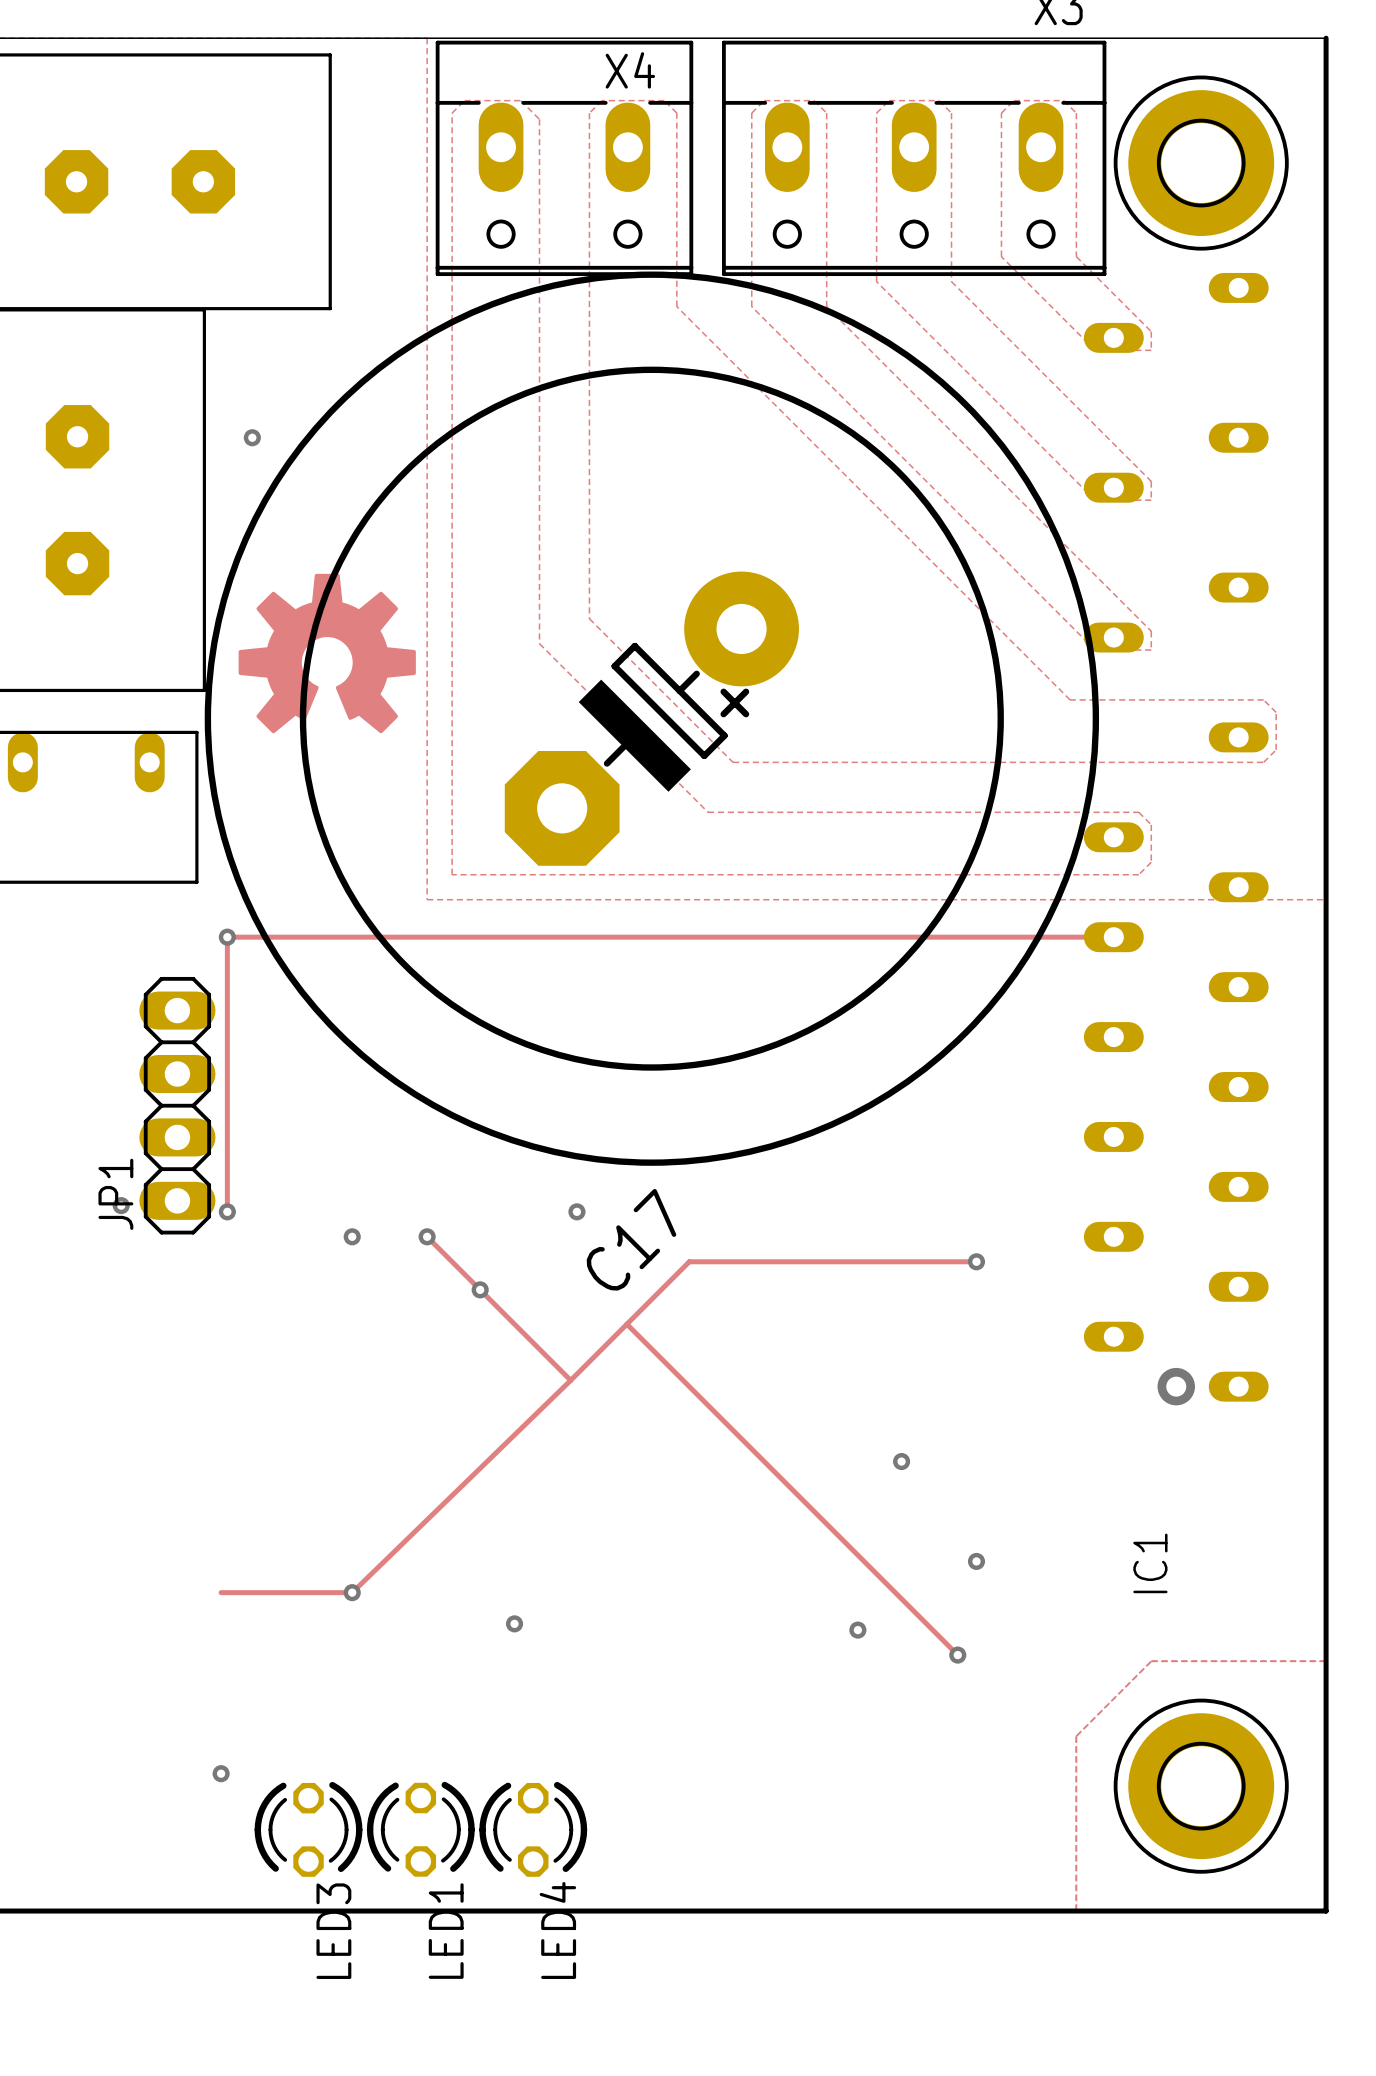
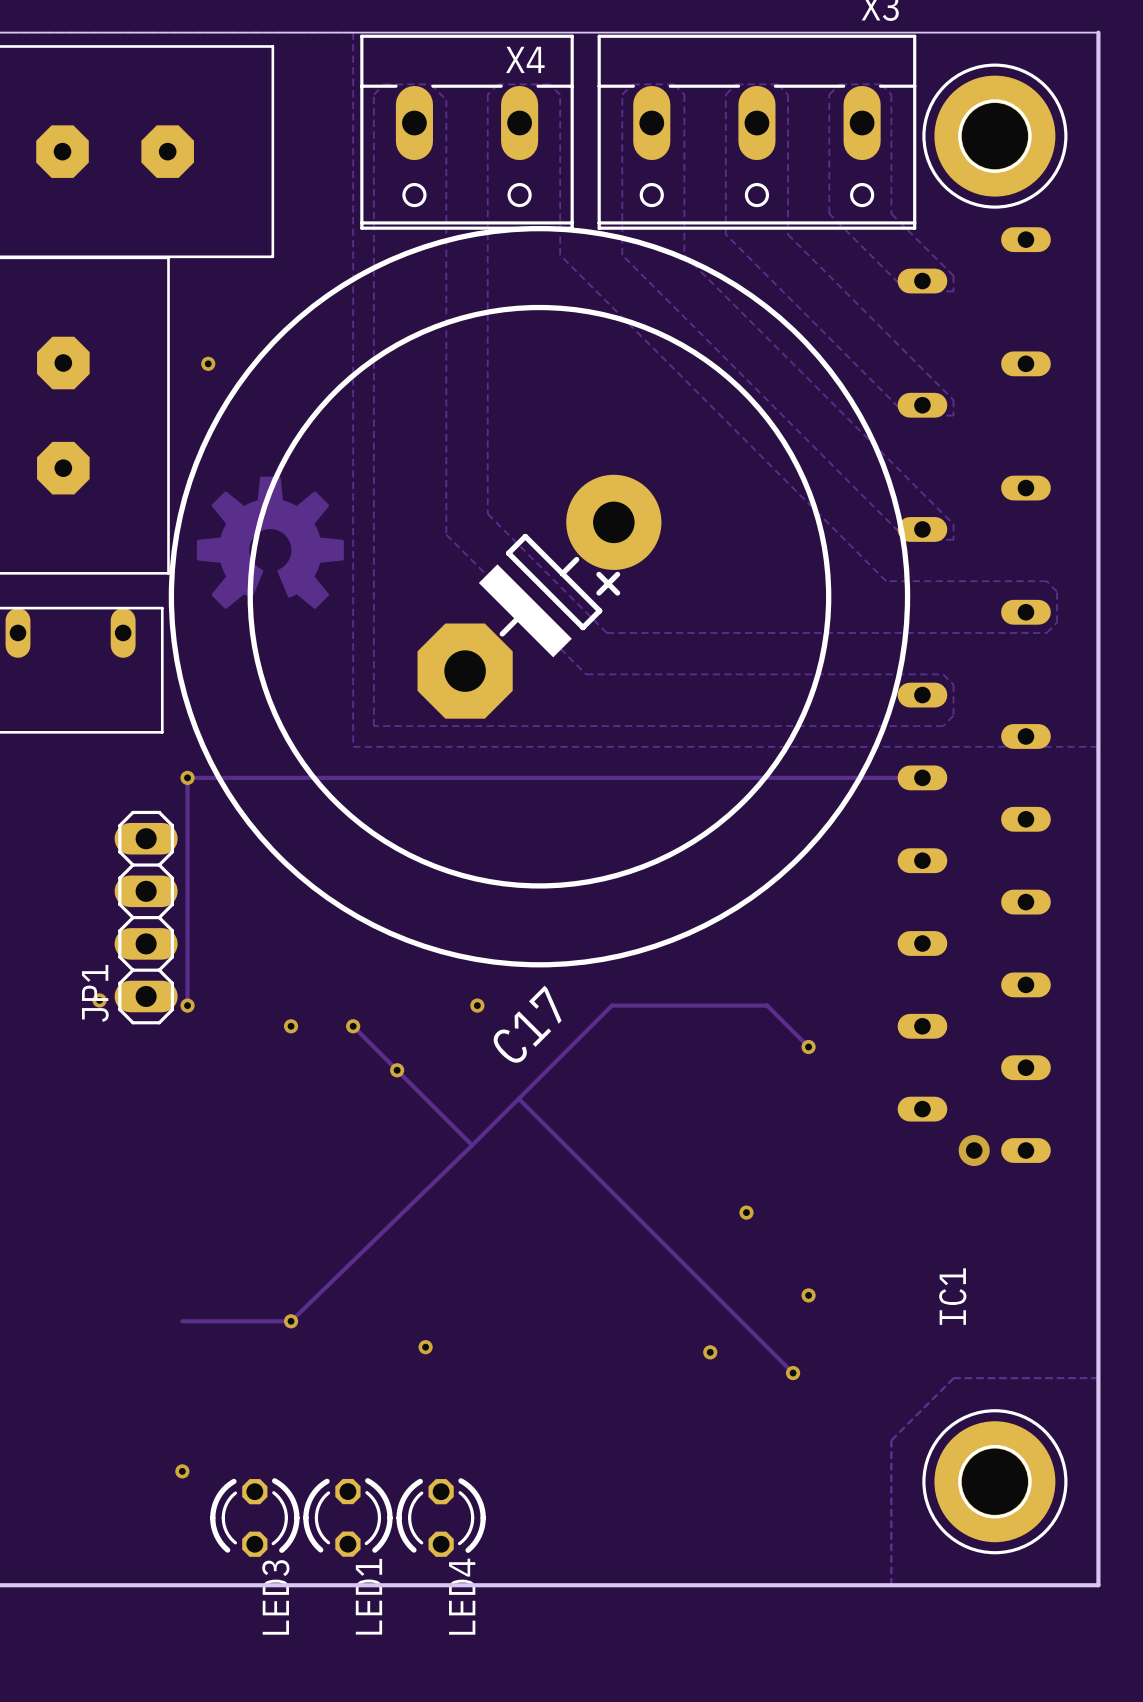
track: (689, 1261) (976, 1261) -> (570, 1046) (611, 1005) (767, 1005) (808, 1046)

